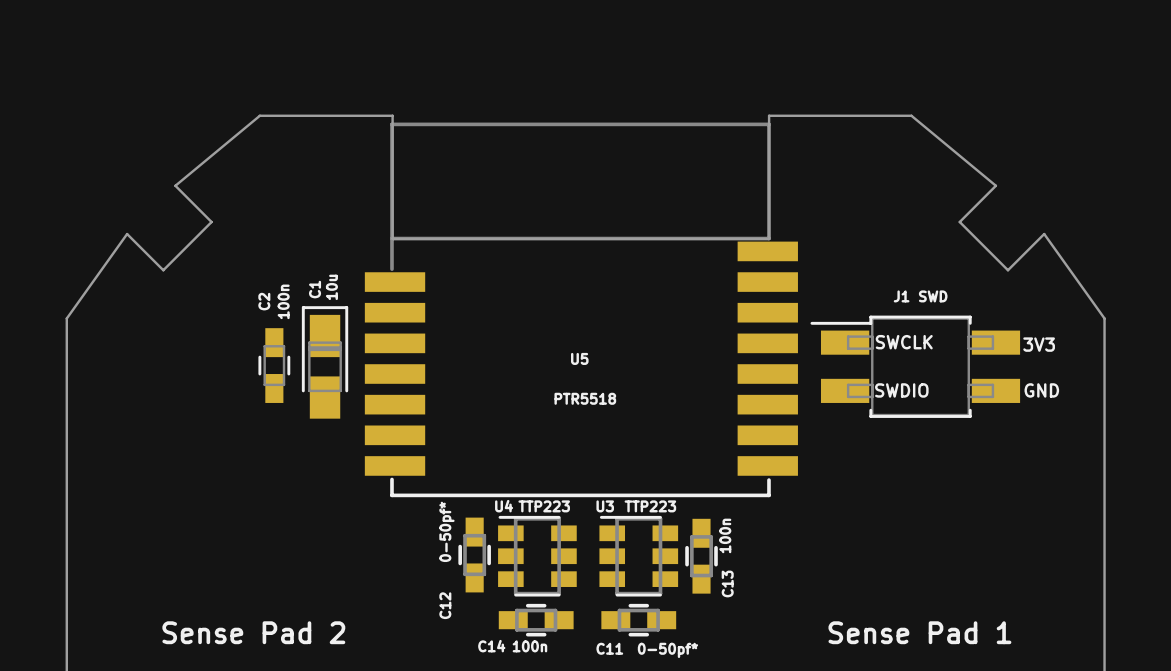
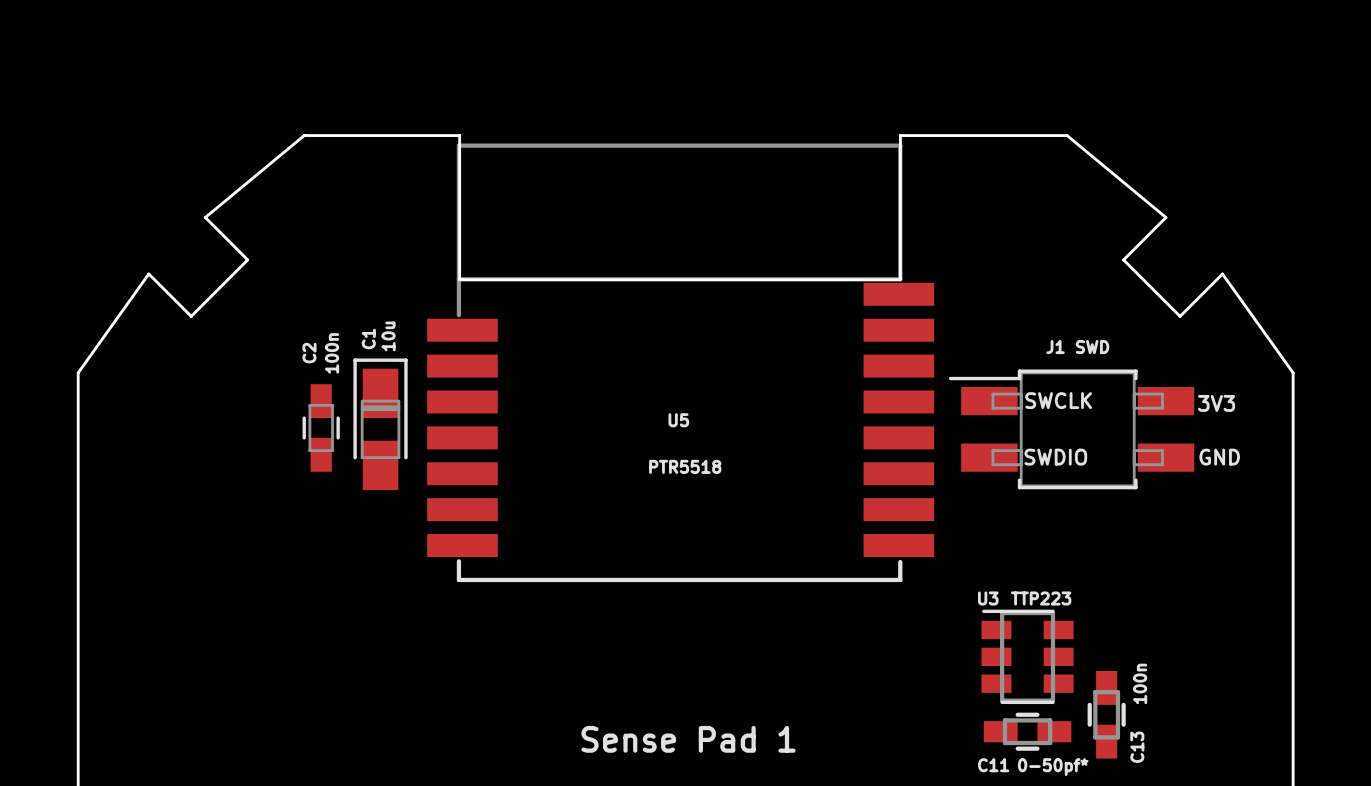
C13 value position: 100n (725, 535) -> 100n (1140, 683)
C12: 0-50pf* (474, 555) -> none
U4: TTP223 (537, 556) -> none
U3 position: (638, 556) -> (1027, 656)
C13 position: (701, 556) -> (1106, 714)
C14: 100n (536, 620) -> none
C11 position: (638, 620) -> (1027, 731)
part: Sense Pad 2 (253, 632) -> none
part position: (919, 632) -> (688, 739)
C11 value position: 0-50pf* (667, 650) -> 0-50pf* (1053, 767)

